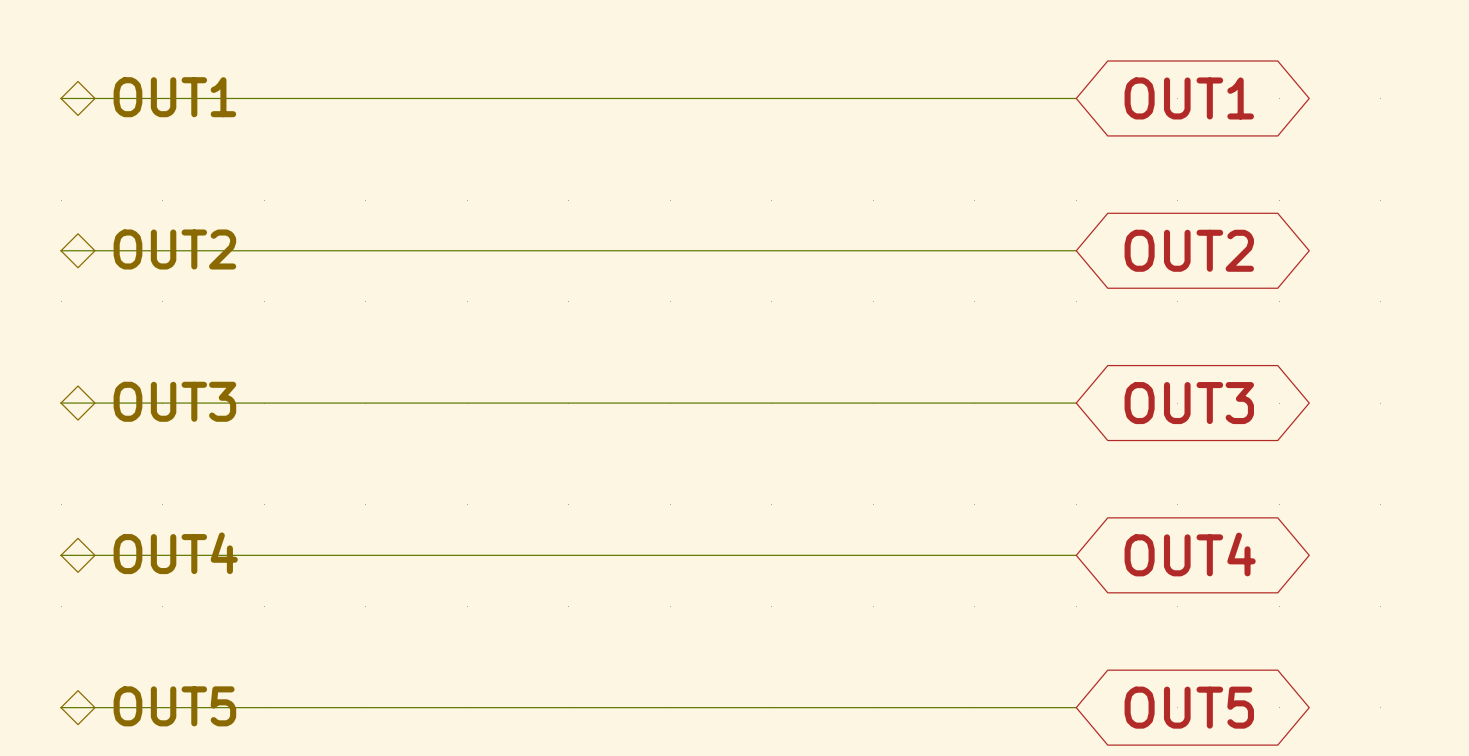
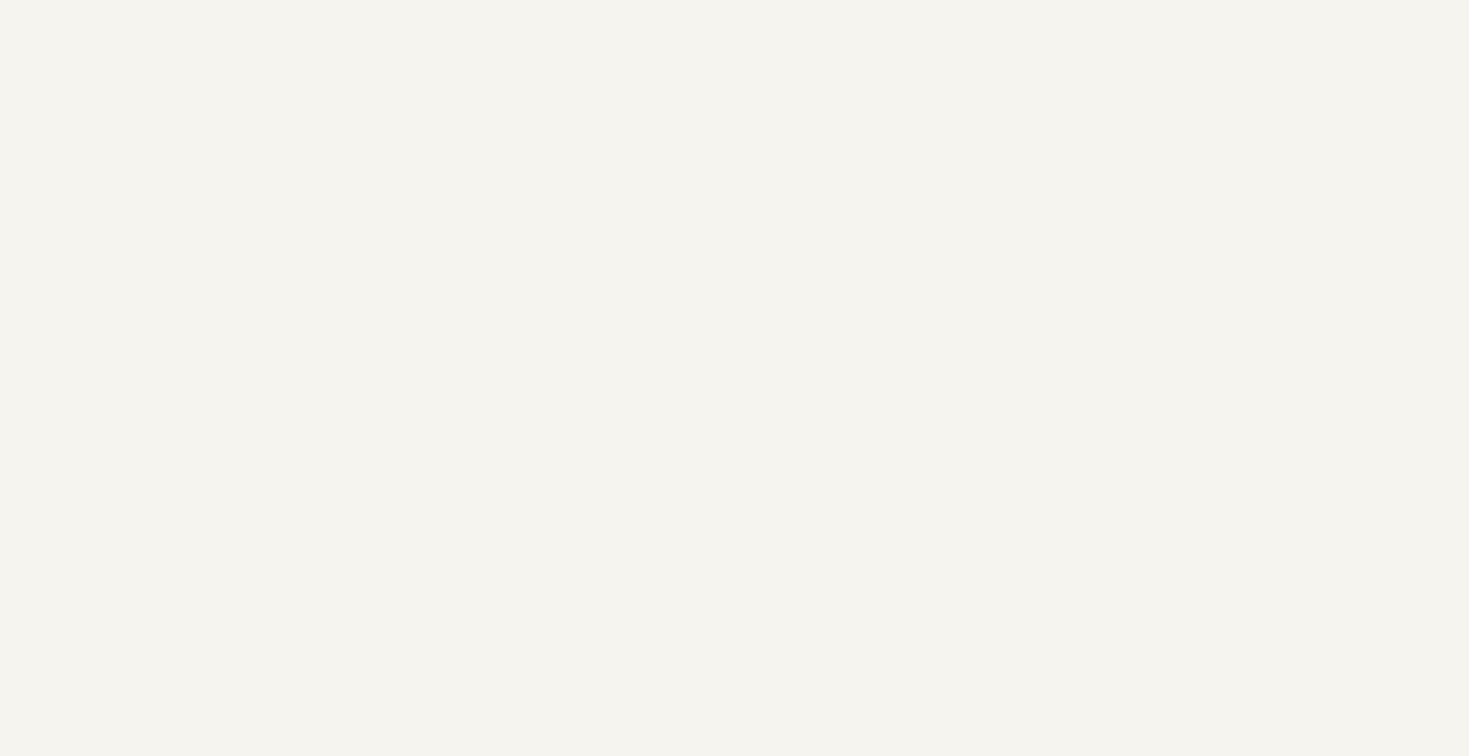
hierarchical label: OUT1 (174, 97) -> none
wire: (61, 98) (1076, 98) -> none
global label: OUT1 (1189, 98) -> none
hierarchical label: OUT2 (174, 249) -> none
wire: (61, 250) (1076, 250) -> none
global label: OUT2 (1189, 250) -> none
hierarchical label: OUT3 (174, 401) -> none
wire: (61, 403) (1076, 403) -> none
global label: OUT3 (1189, 403) -> none
hierarchical label: OUT4 (175, 553) -> none
global label: OUT4 (1190, 554) -> none
wire: (61, 555) (1076, 555) -> none
hierarchical label: OUT5 (174, 706) -> none
wire: (61, 707) (1076, 707) -> none
global label: OUT5 (1189, 707) -> none

